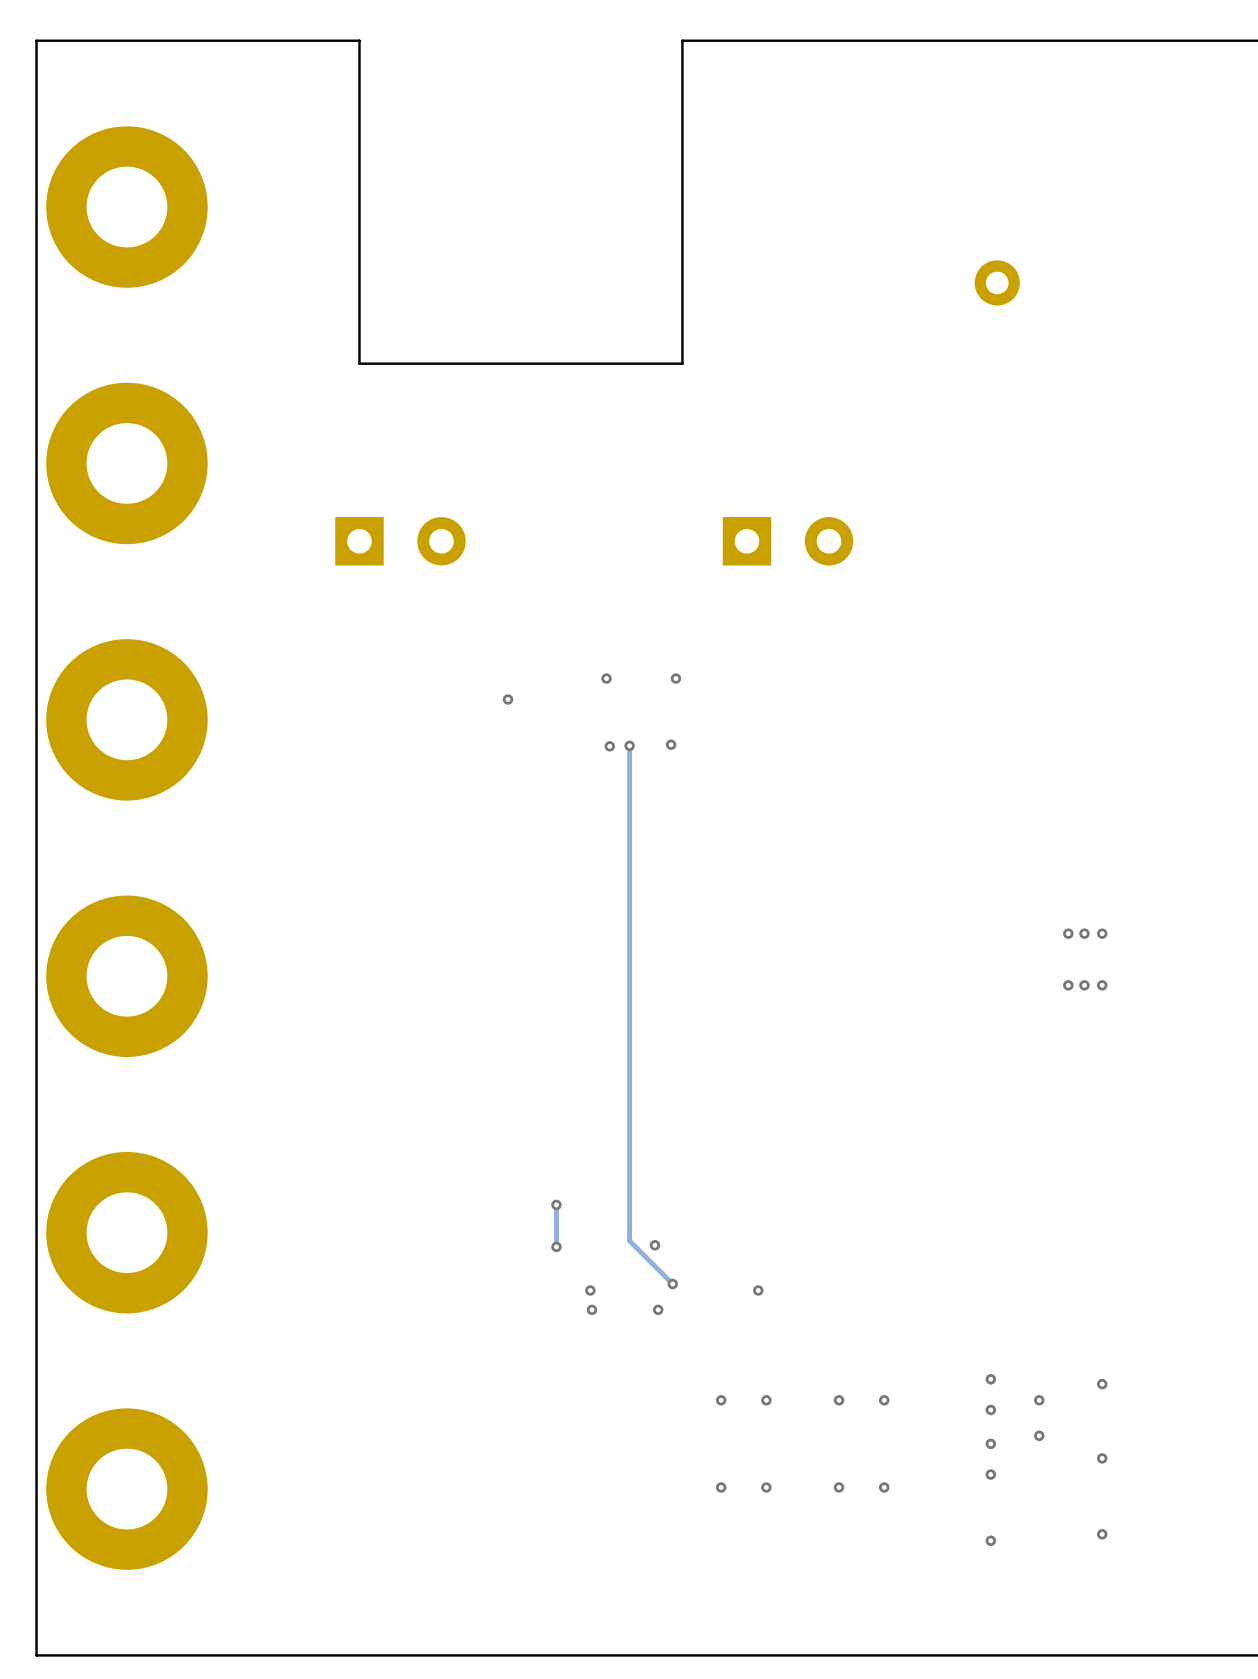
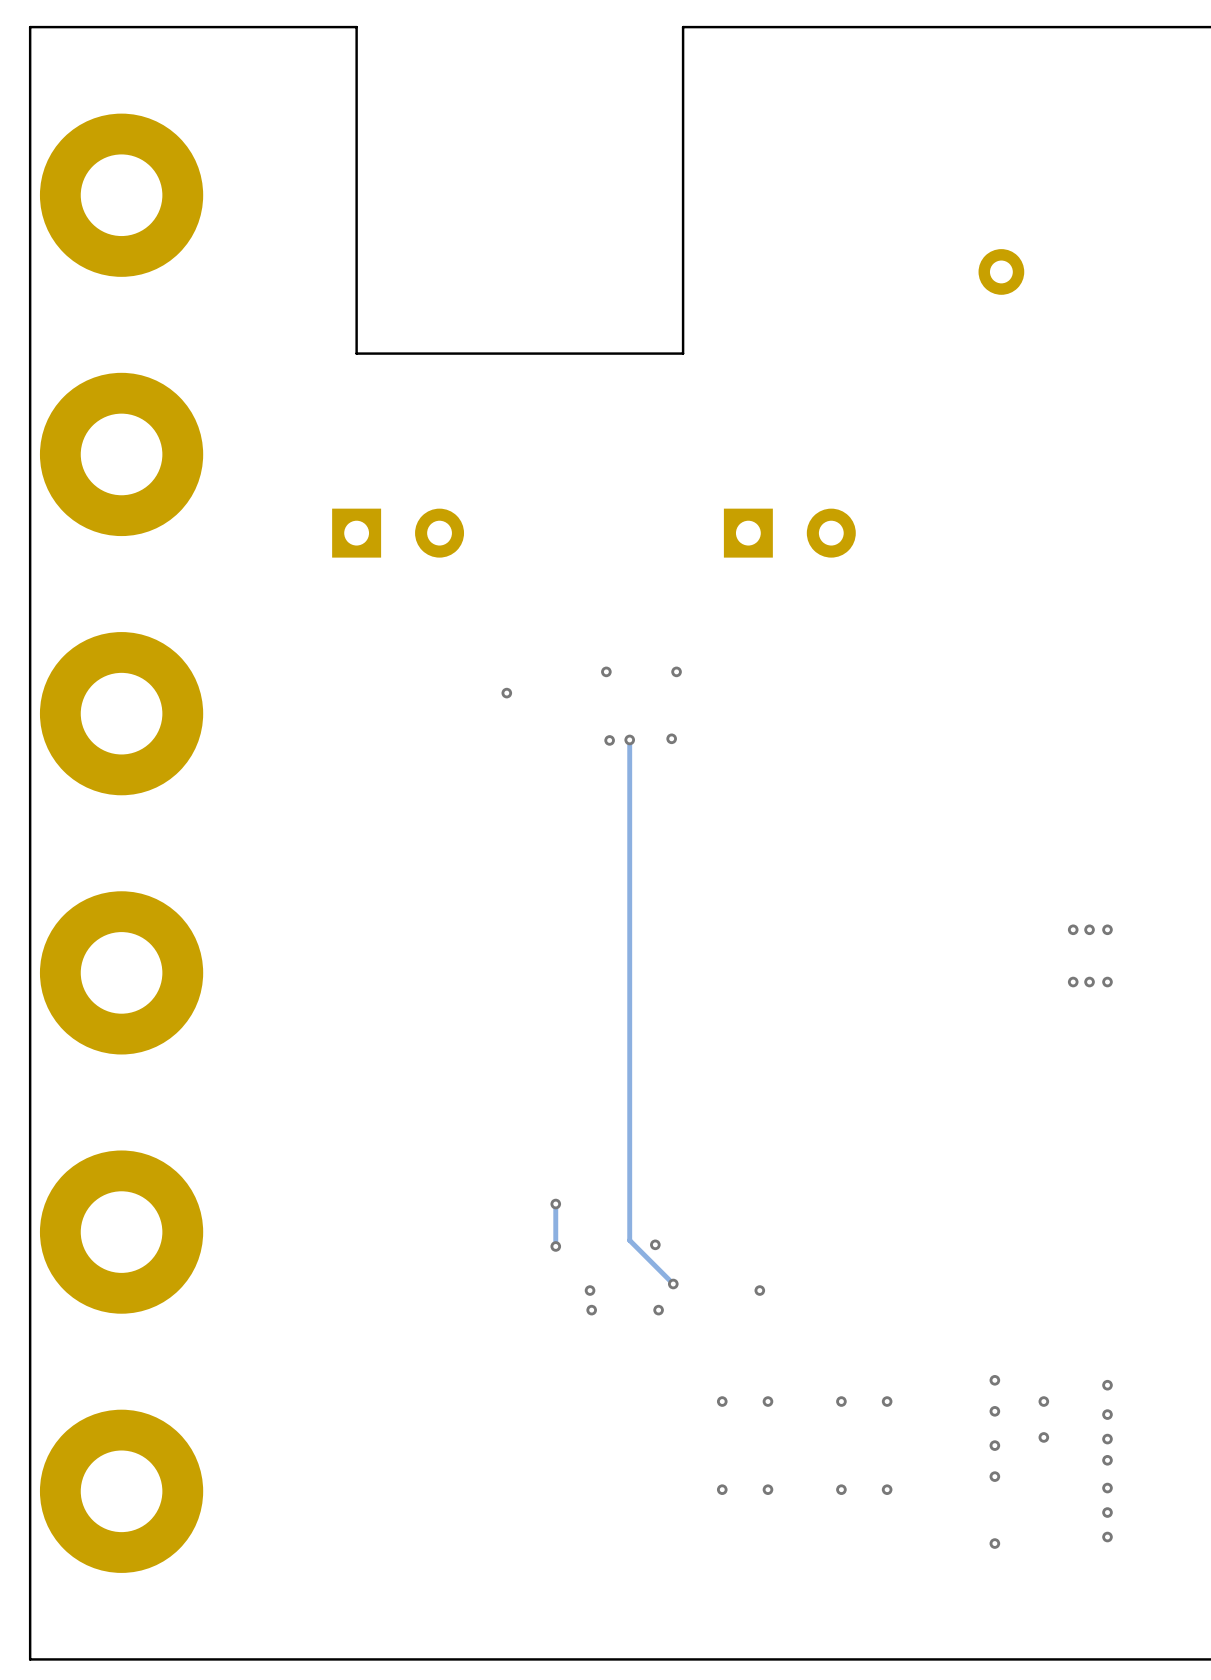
via: none -> (1107, 1414)
via: none -> (1107, 1439)
via: none -> (1107, 1488)
via: none -> (1107, 1512)

